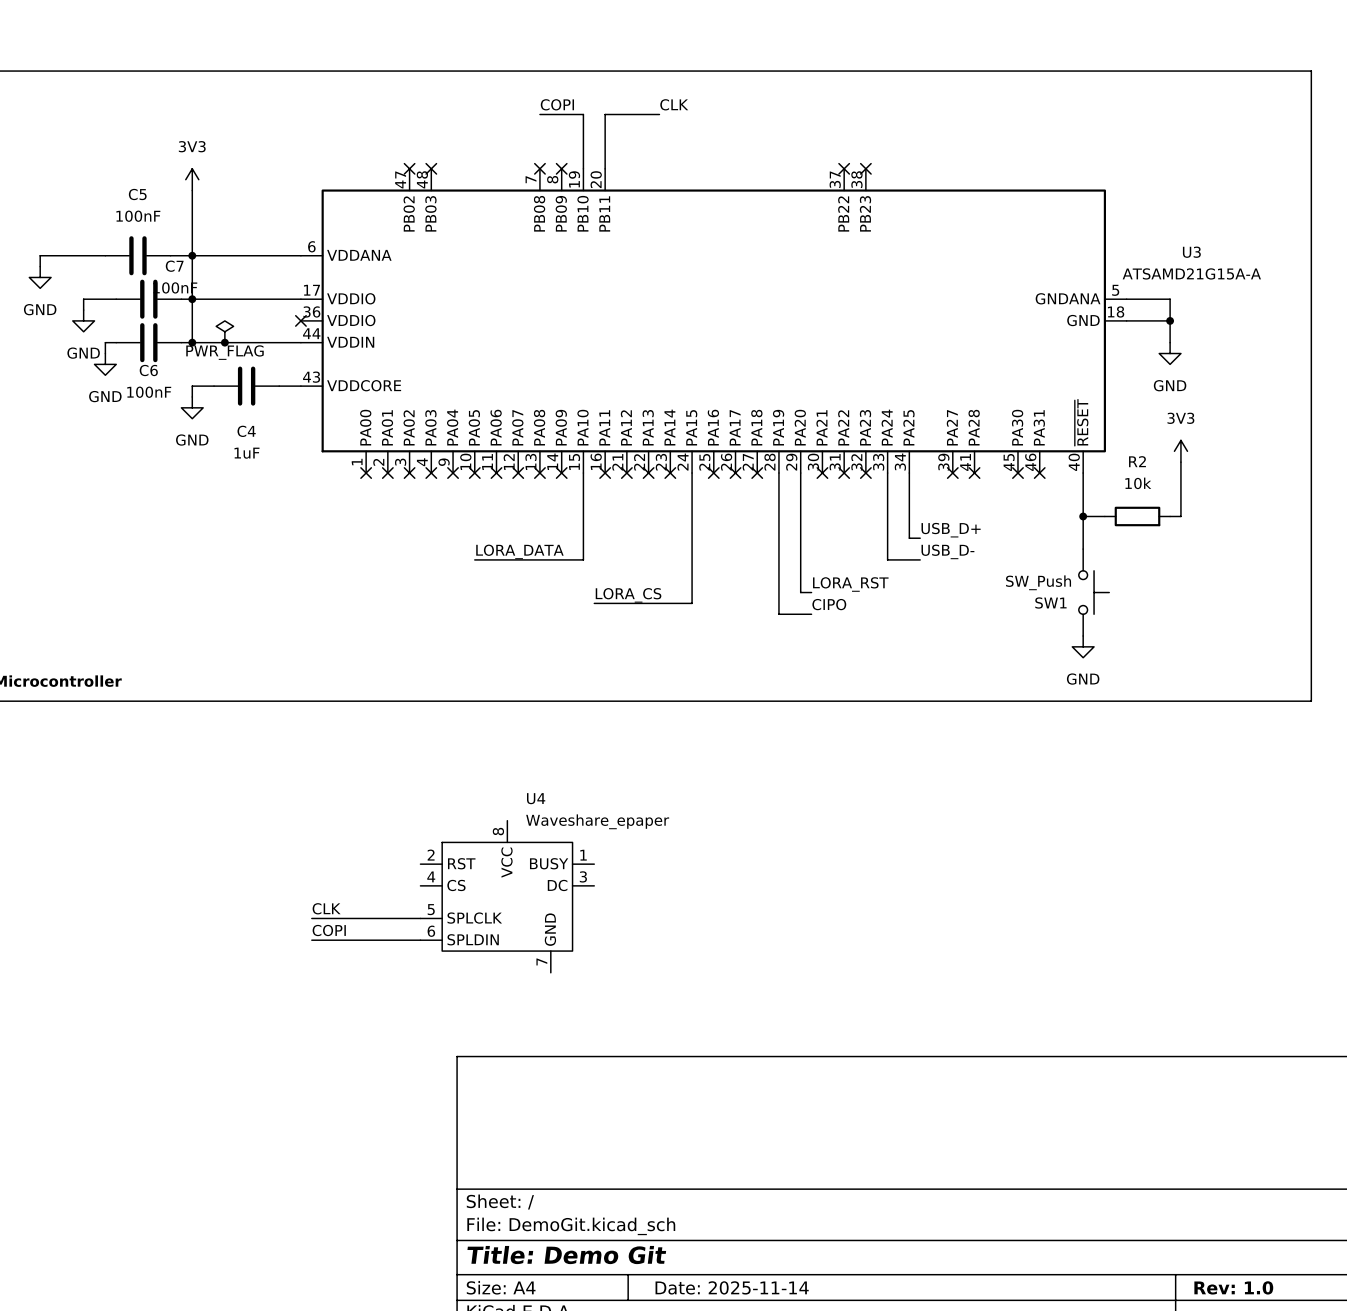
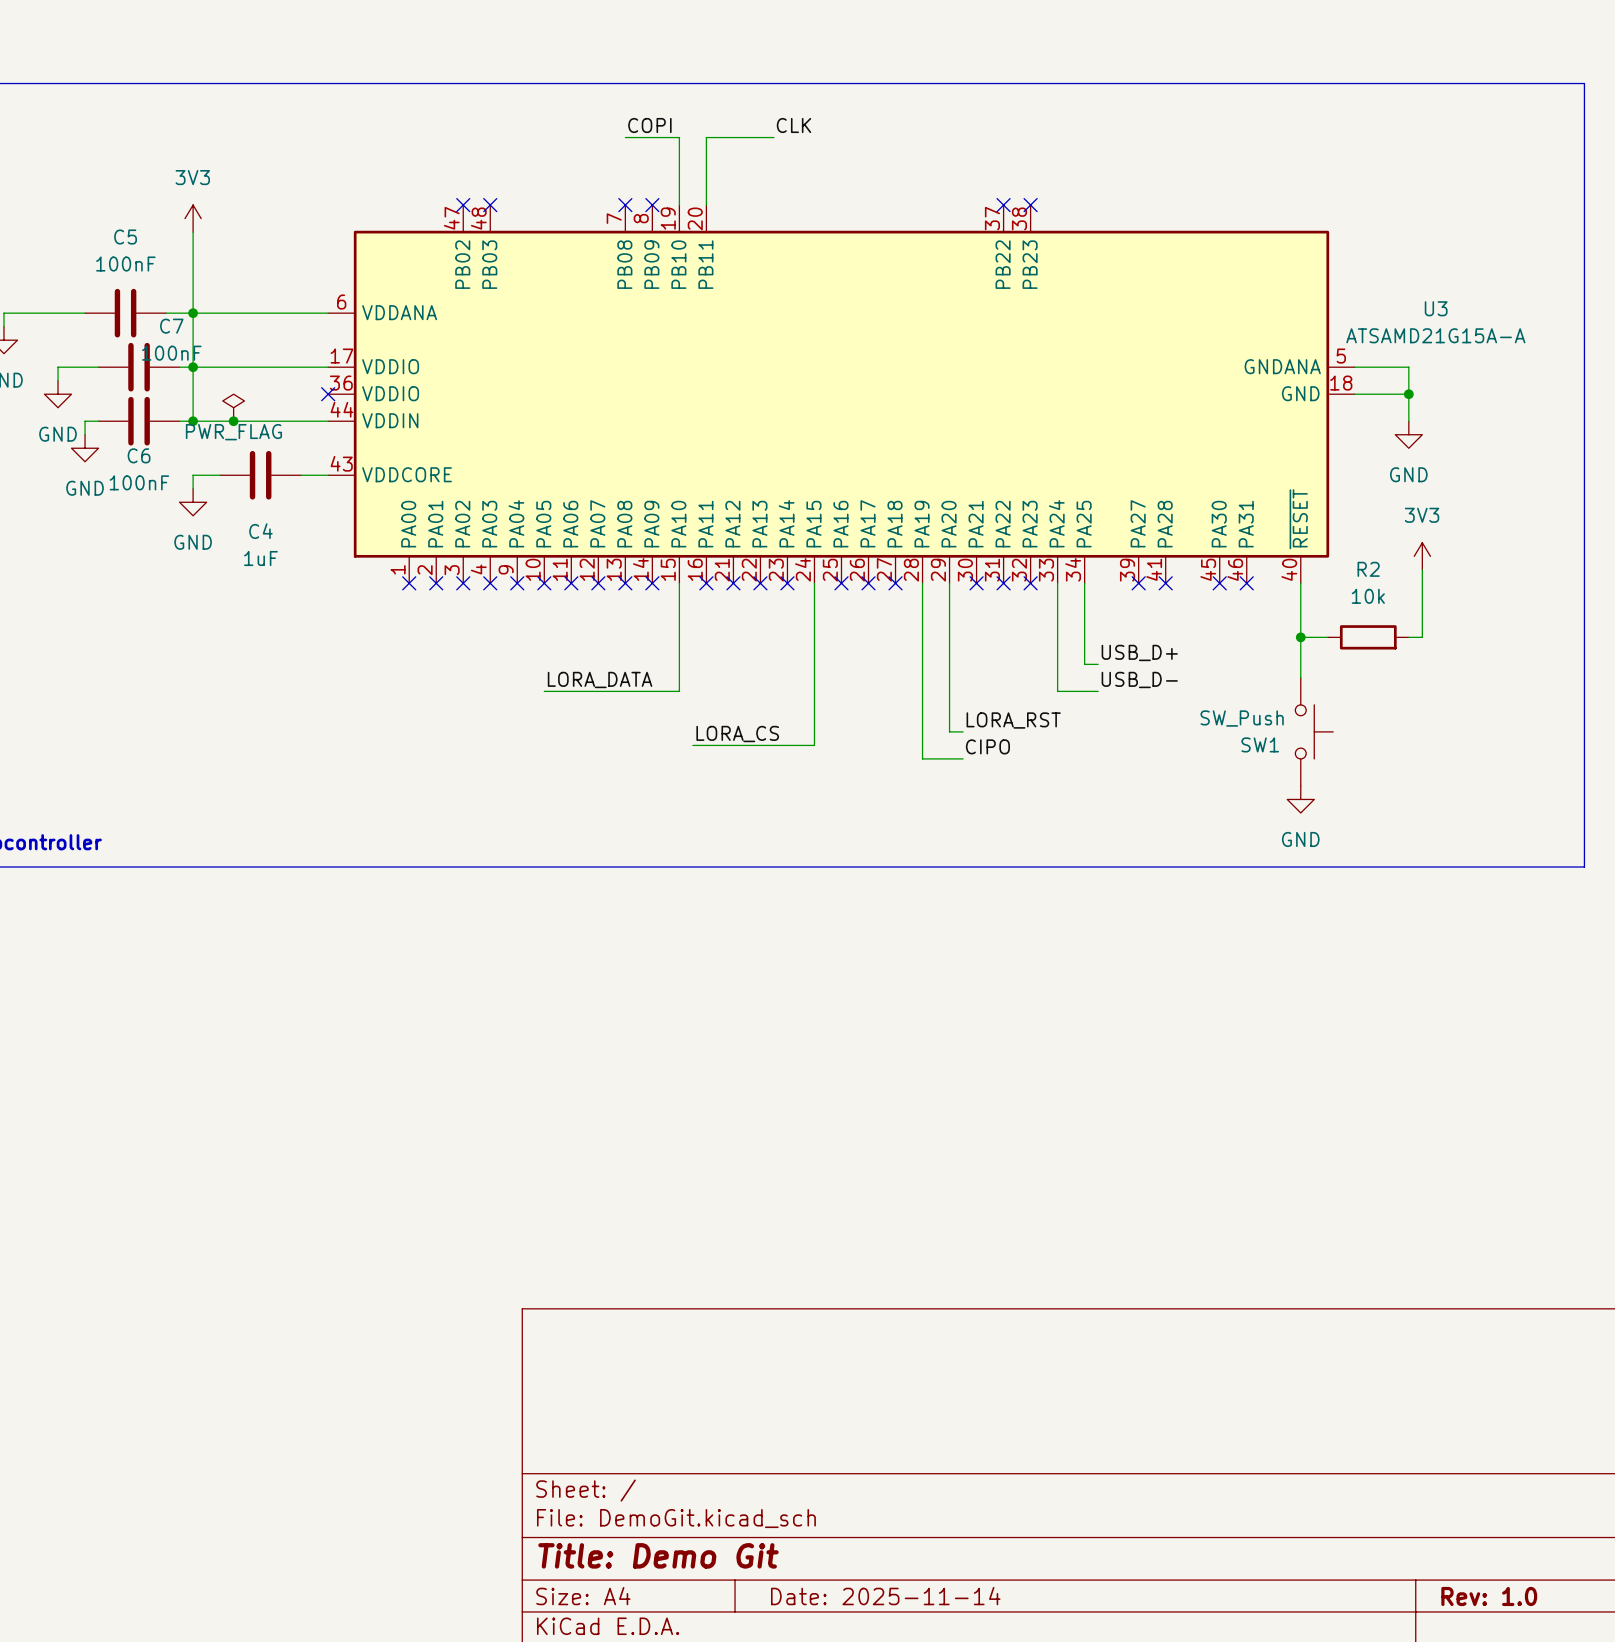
U4: Waveshare_epaper (507, 896) -> none
label: CLK (326, 908) -> none
wire: (311, 918) (420, 918) -> none
label: COPI (329, 930) -> none
wire: (311, 940) (420, 940) -> none

